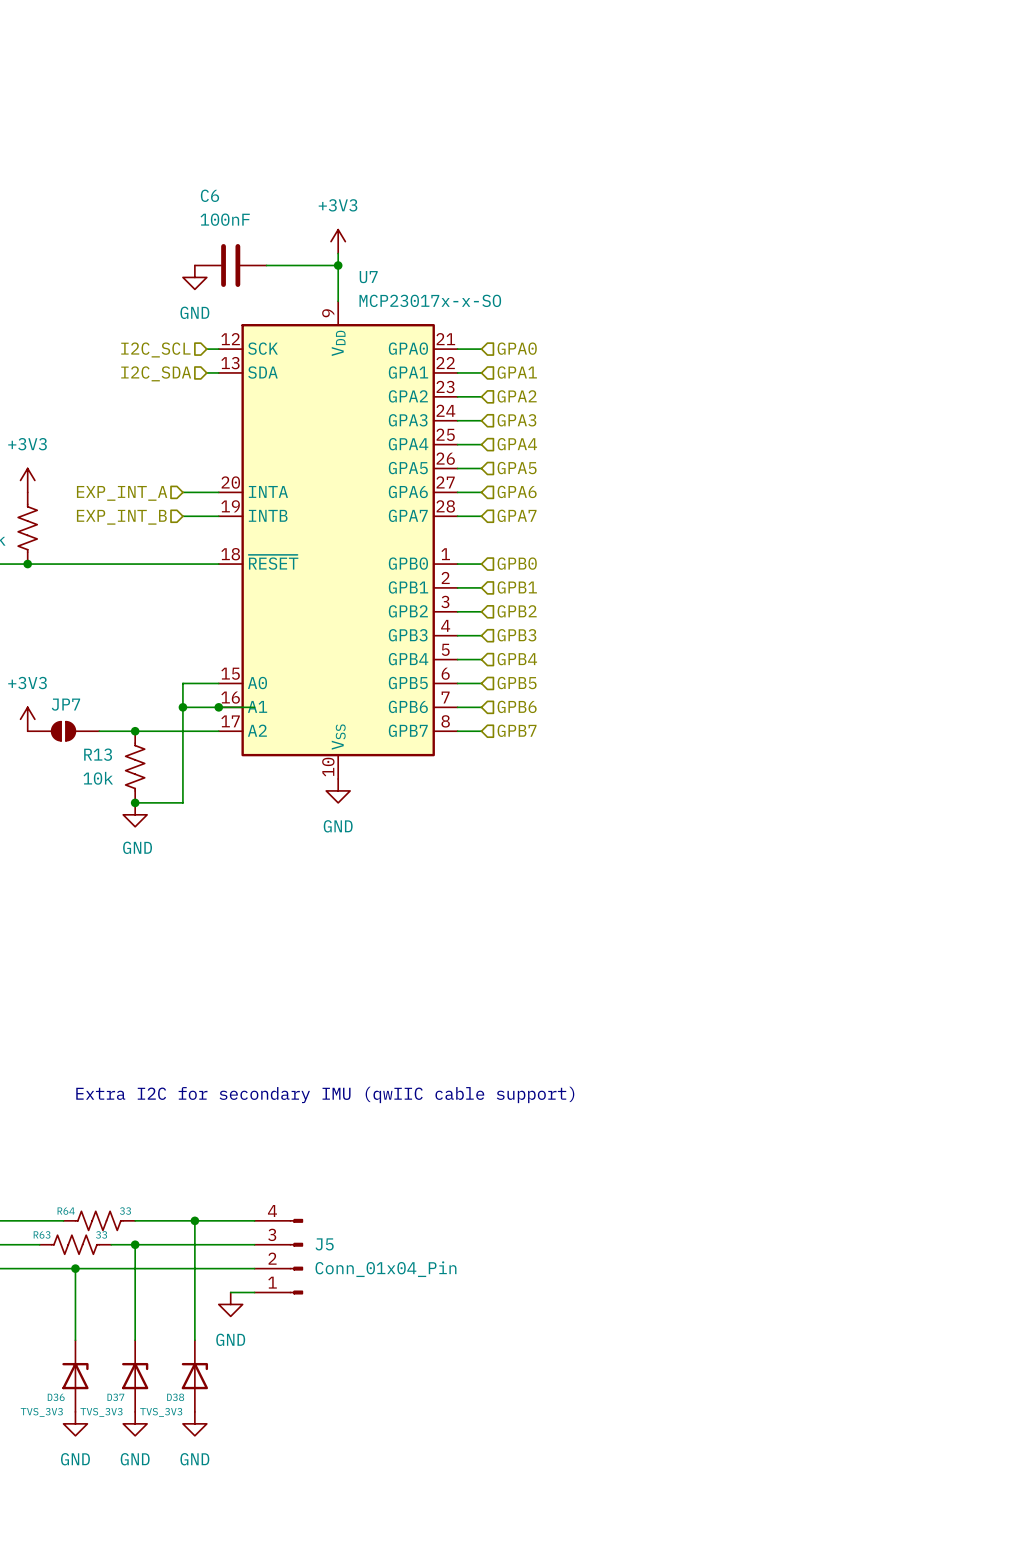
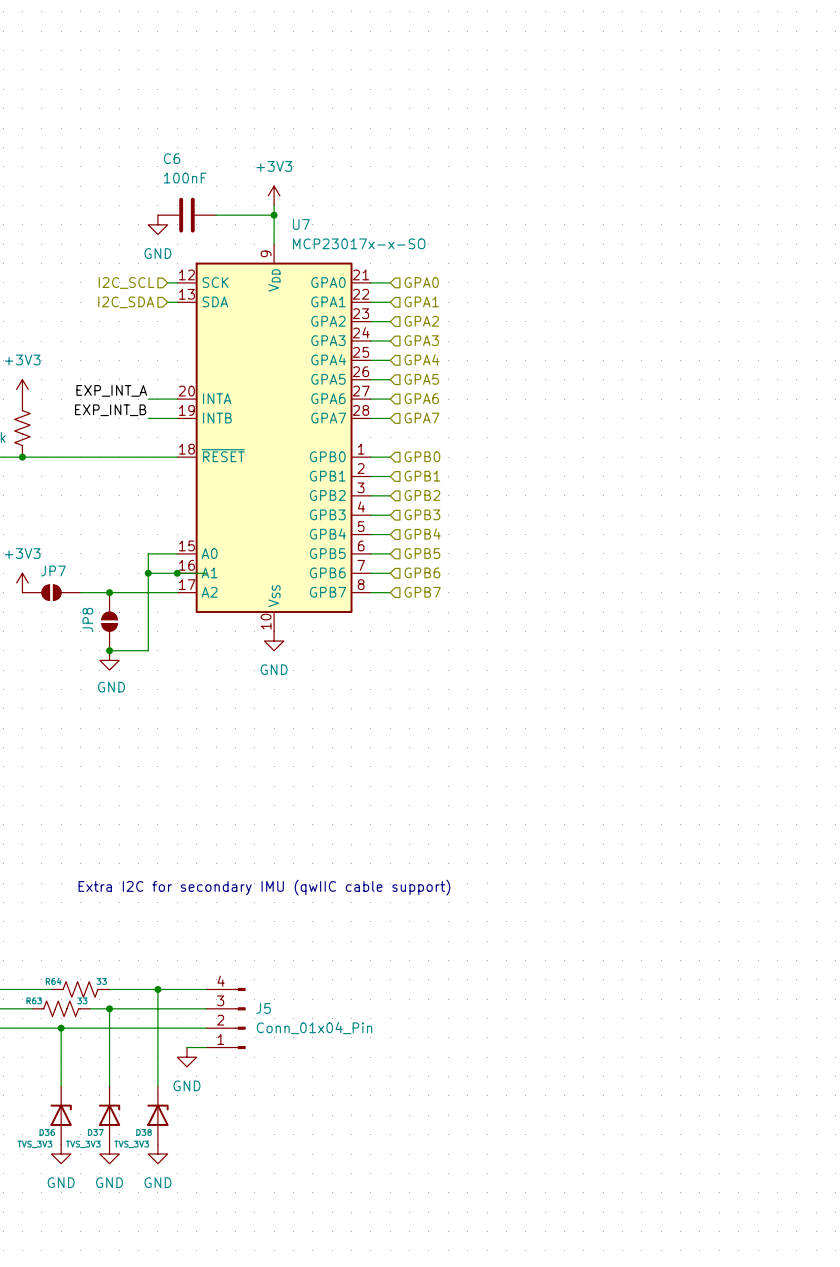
label: none -> EXP_INT_A (111, 390)
hierarchical label: EXP_INT_A (122, 493) -> none
label: none -> EXP_INT_B (110, 410)
hierarchical label: EXP_INT_B (121, 517) -> none
R13: 10k (135, 767) -> none
JP8: none -> (109, 621)

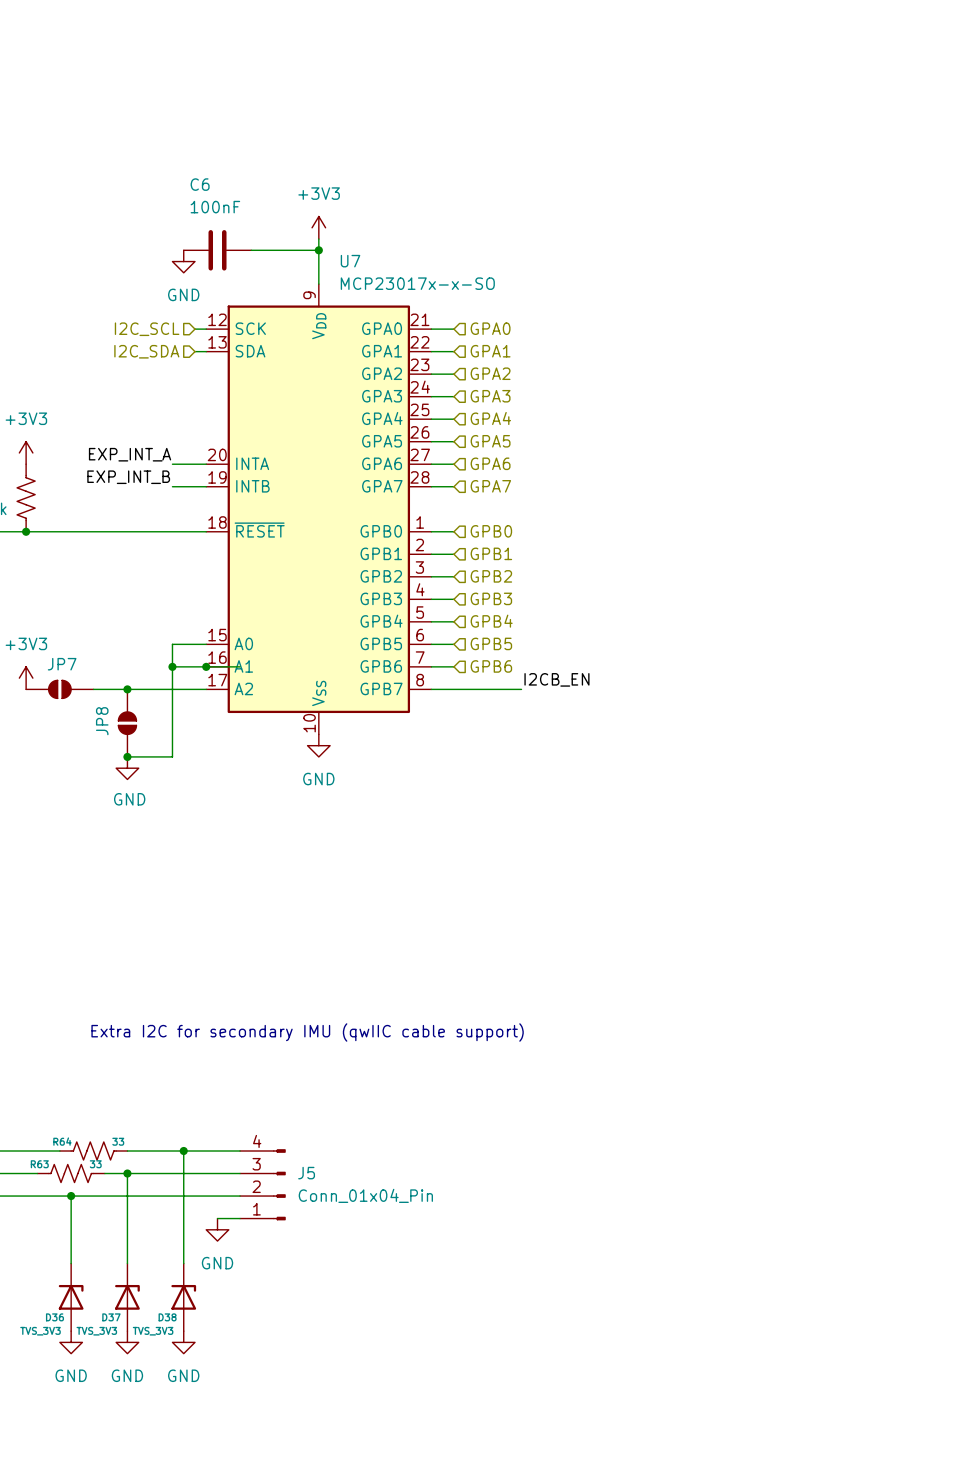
label: none -> I2CB_EN (556, 679)
wire: none -> (453, 689) (521, 689)
hierarchical label: GPB7 (422, 592) -> none

